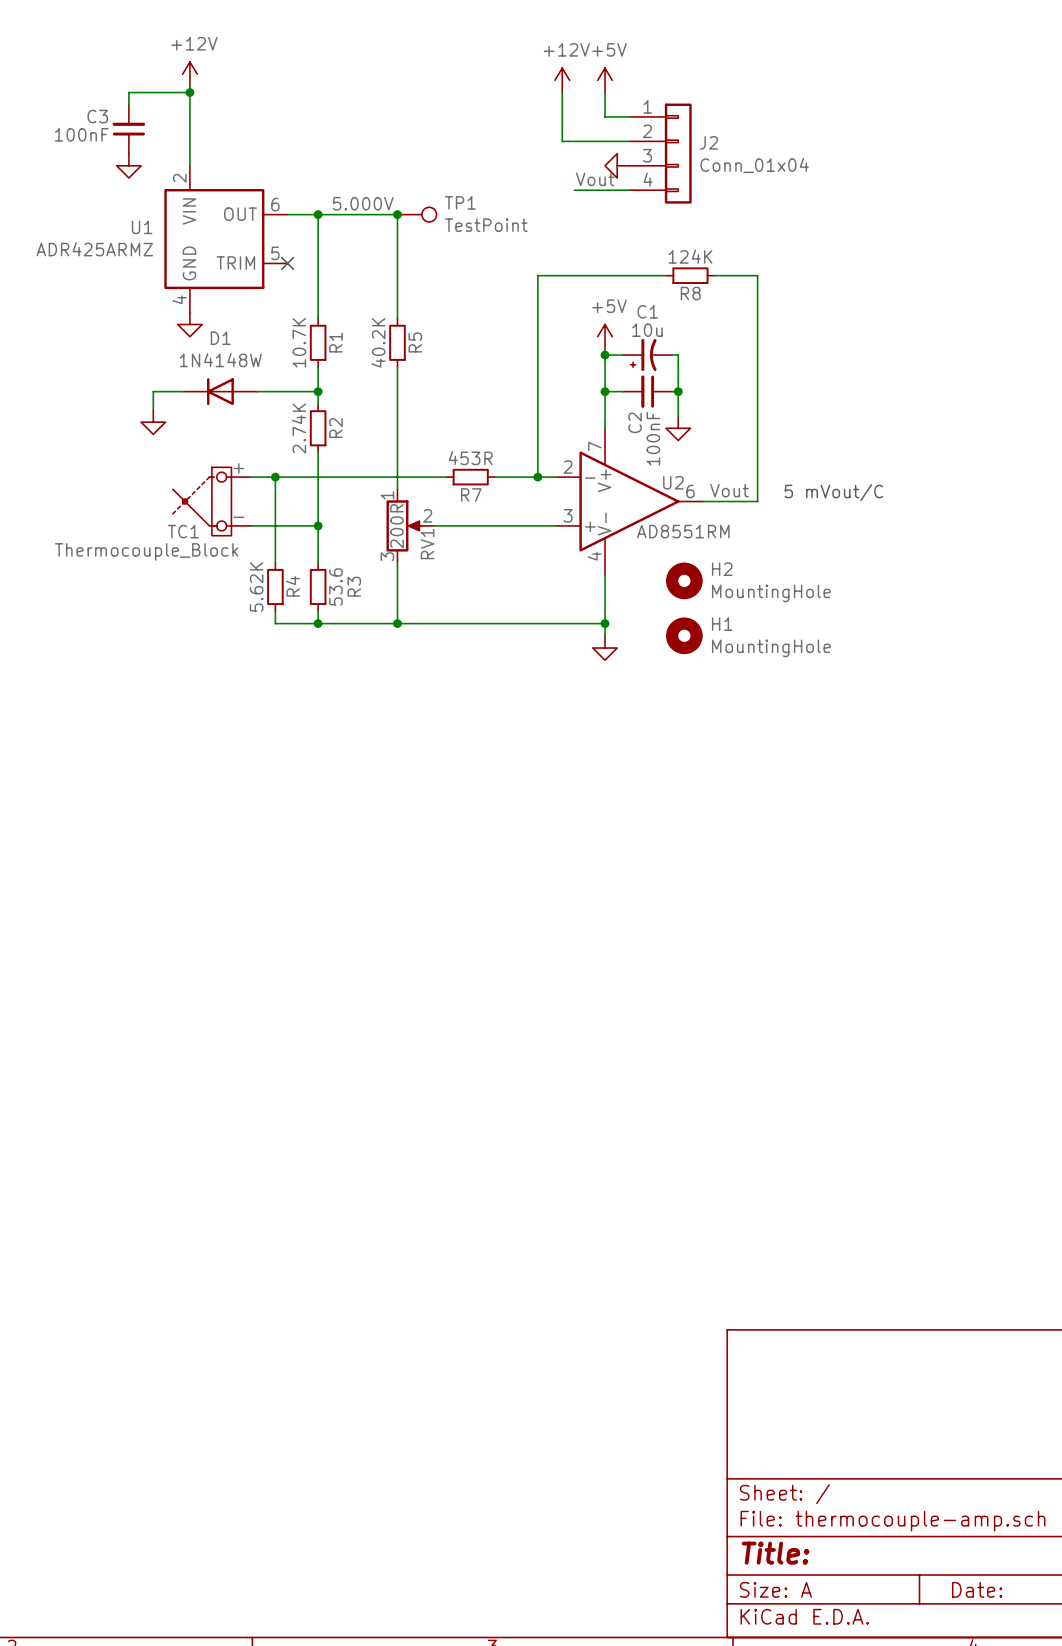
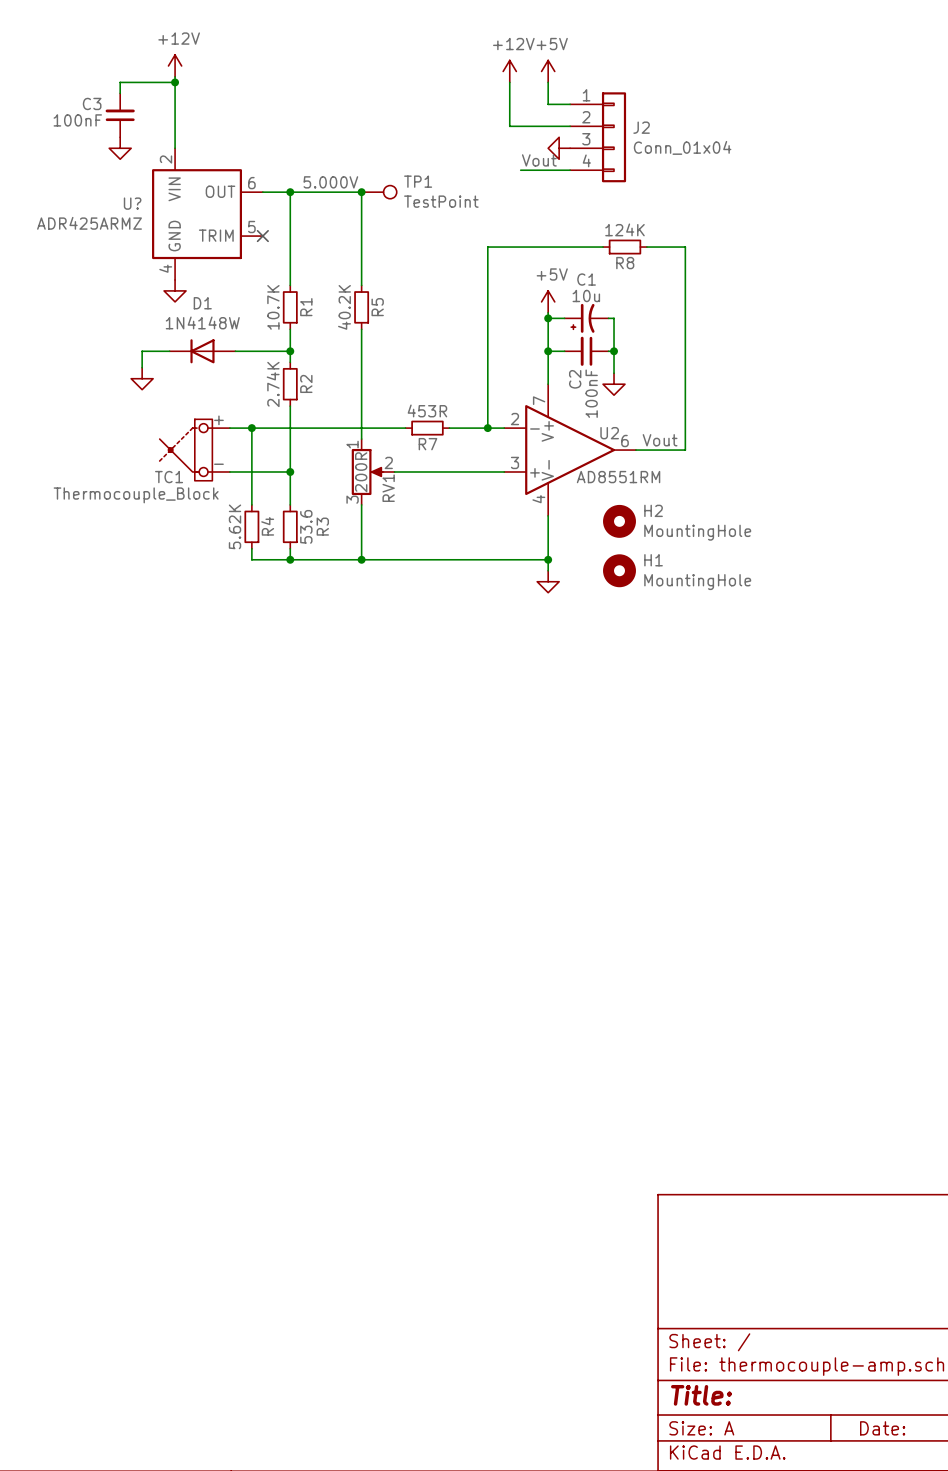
U1 name: U1 (142, 227) -> U? (132, 203)
text: 5 mVout/C (833, 492) -> none

